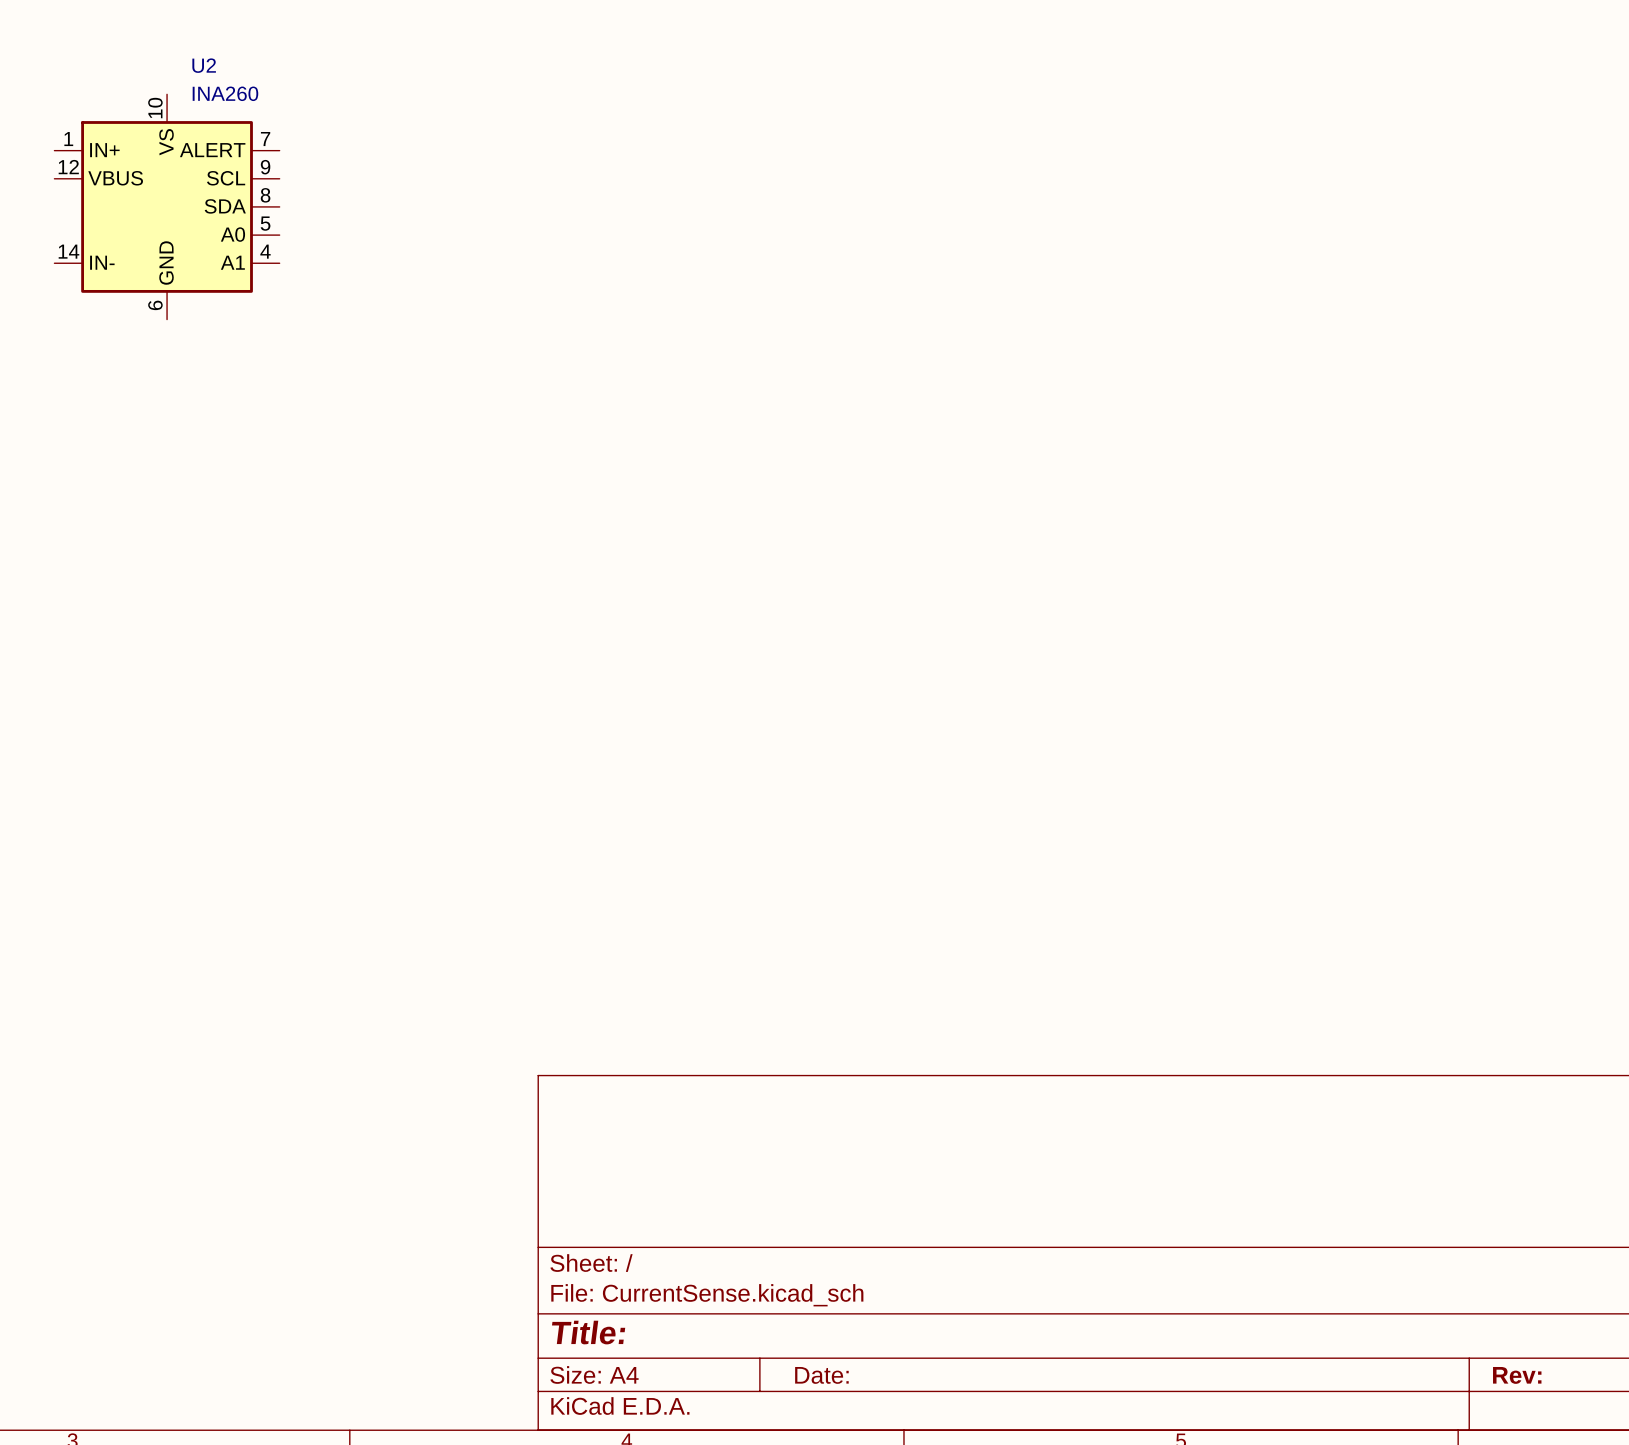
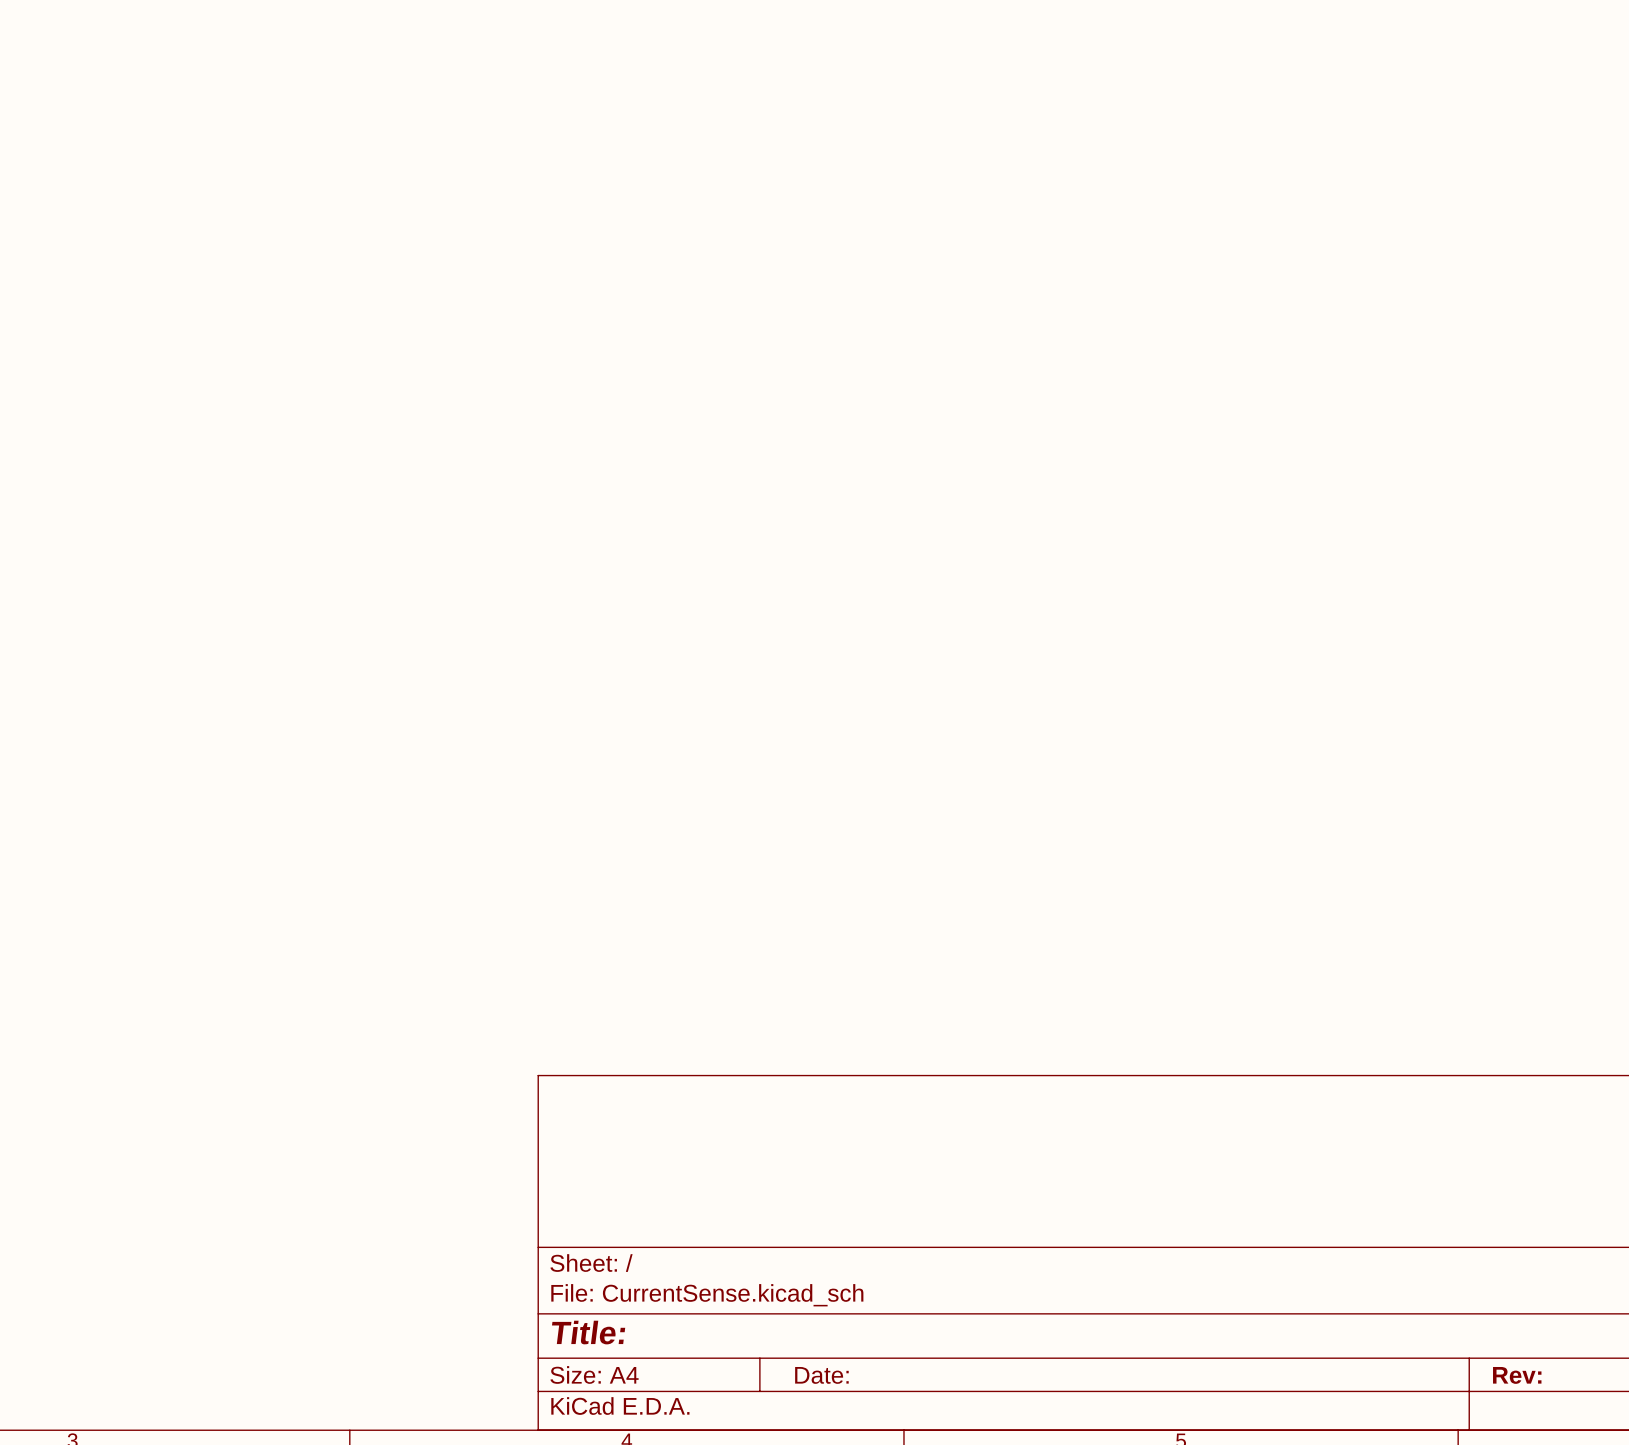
U2: INA260 (167, 206) -> none

